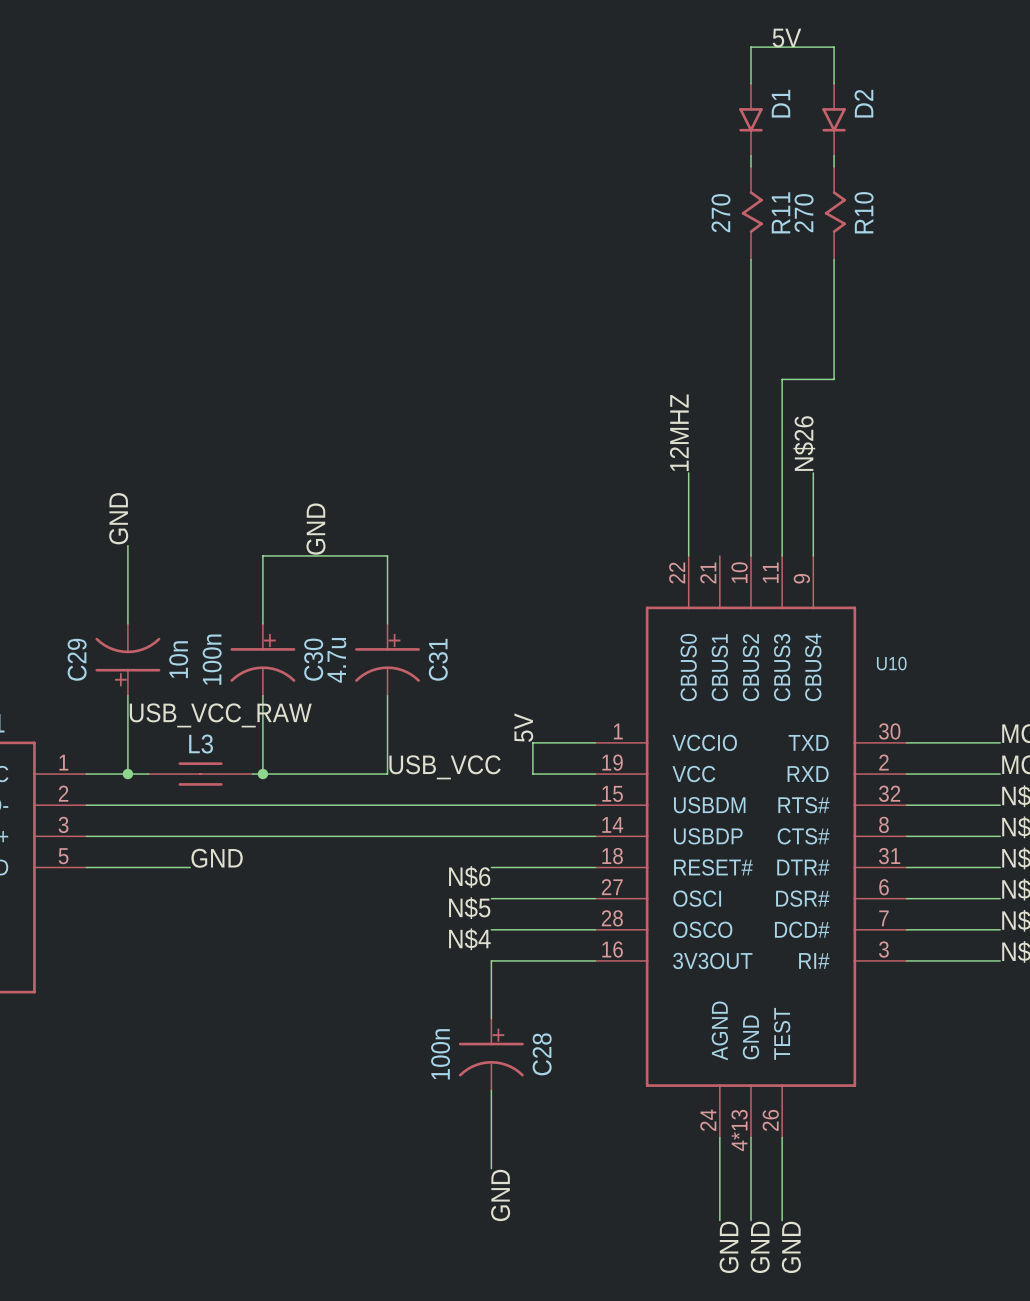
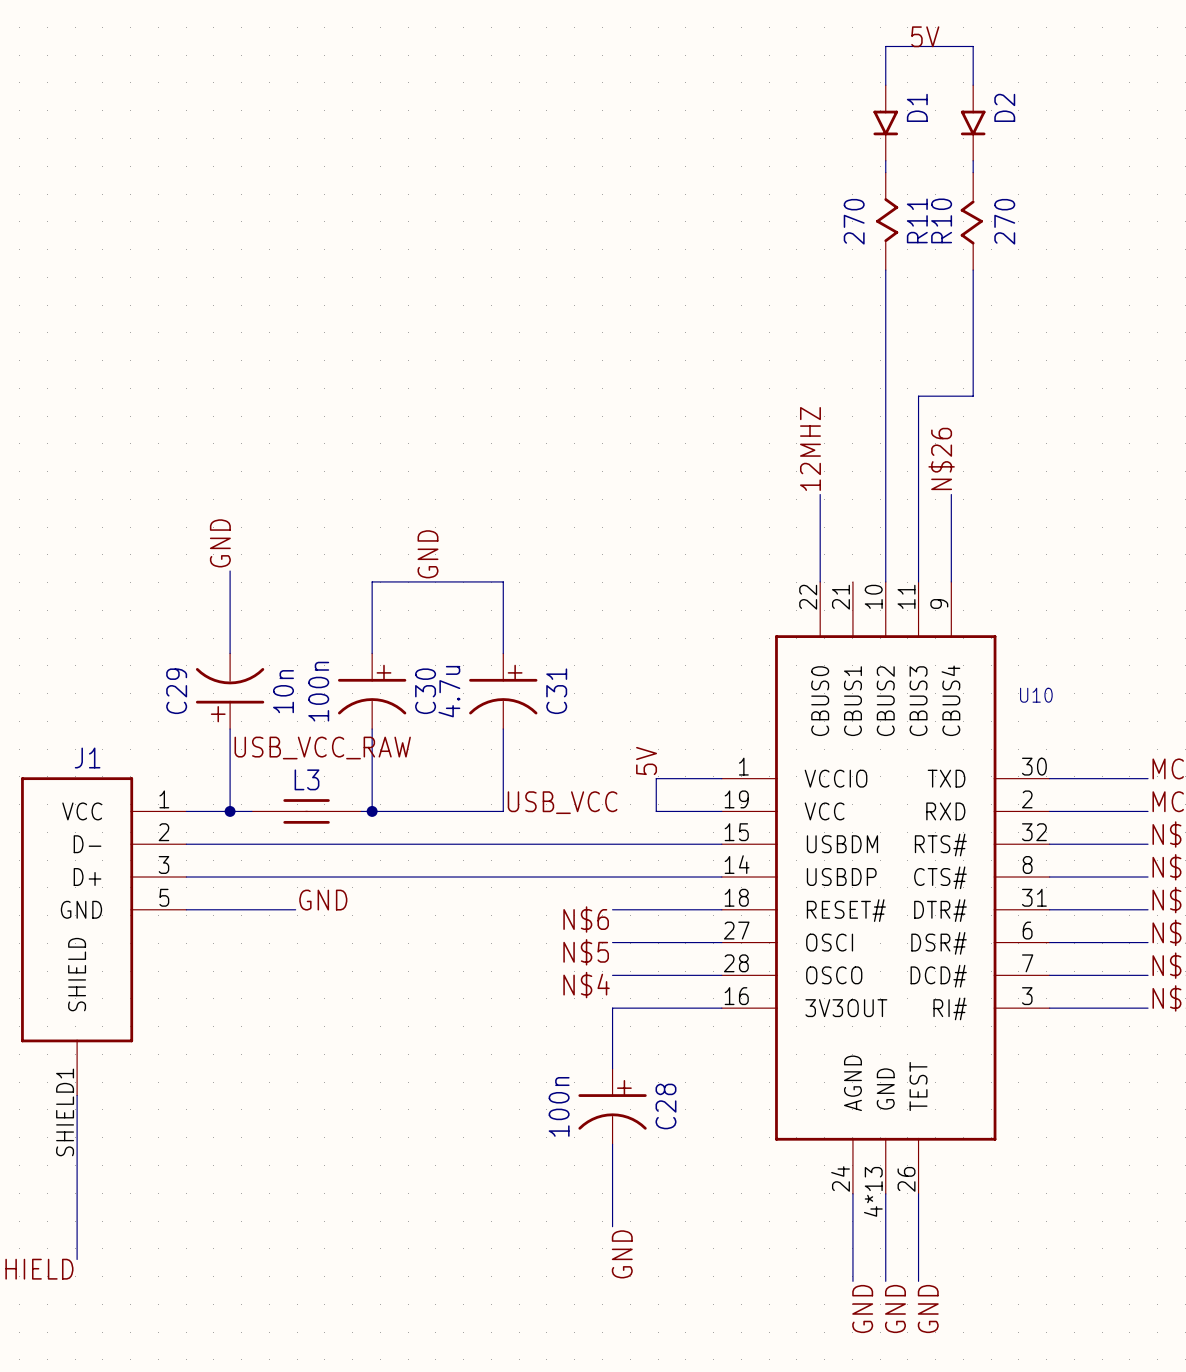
R10 rotation: 0° (835, 212) -> 180° (971, 222)

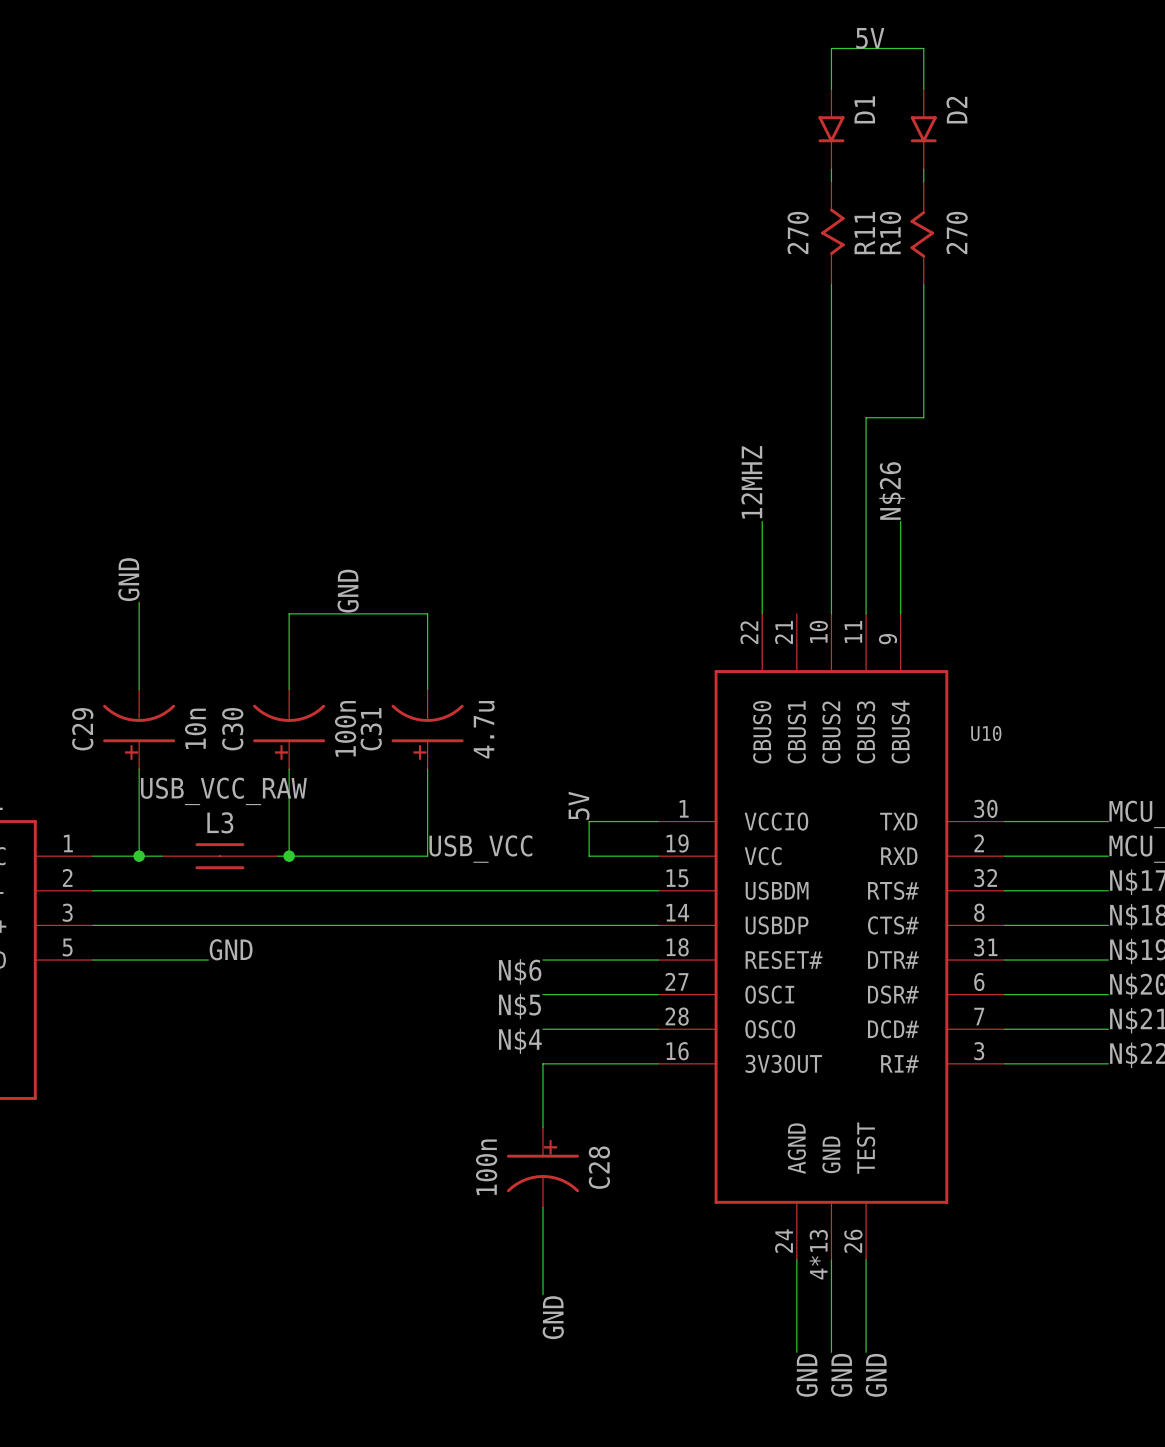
C30 symbol: [337, 653, 407, 730] -> [253, 689, 326, 770]
C31 symbol: [469, 653, 538, 730] -> [391, 689, 464, 770]
C30 value position: 100n (318, 691) -> 100n (345, 728)
C30 name position: C30 (425, 691) -> C30 (232, 729)
C31 value position: 4.7u (449, 691) -> 4.7u (484, 729)
C31 name position: C31 (556, 691) -> C31 (371, 729)

